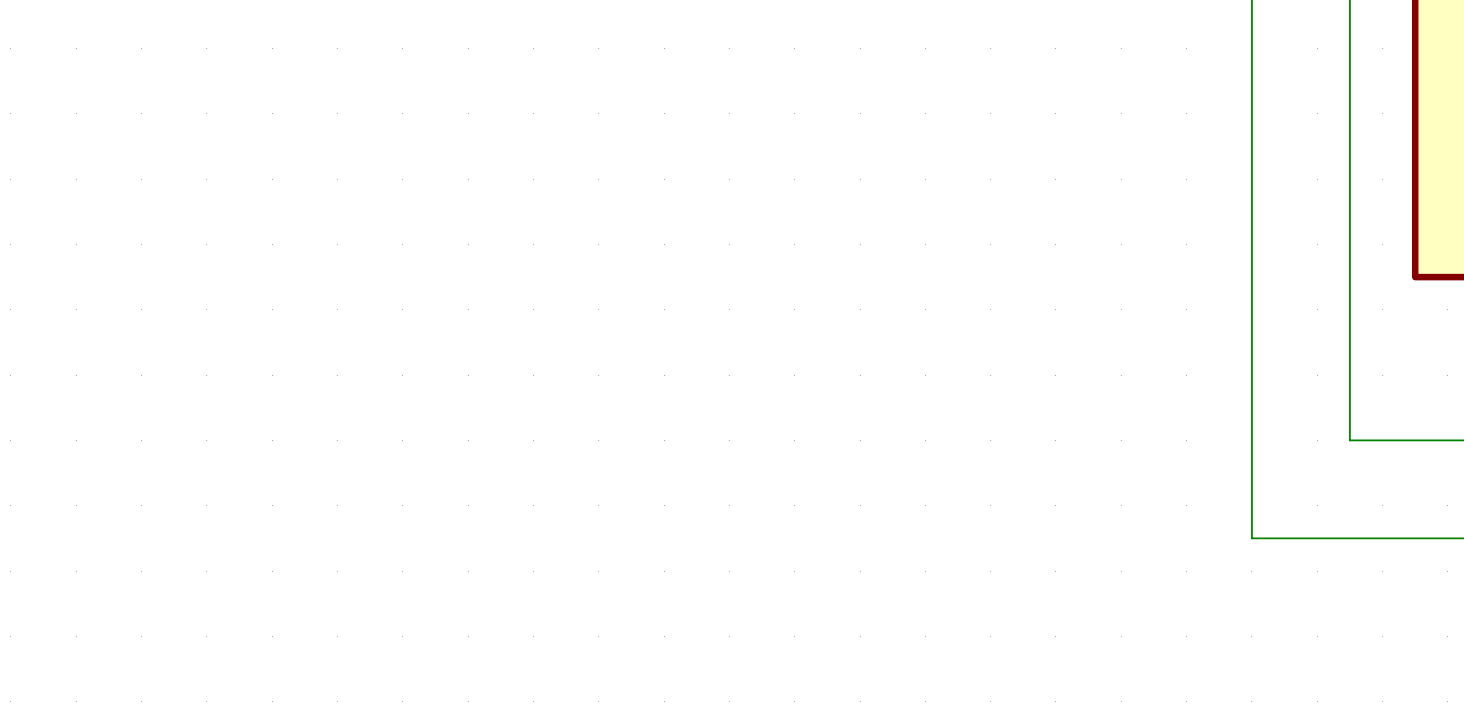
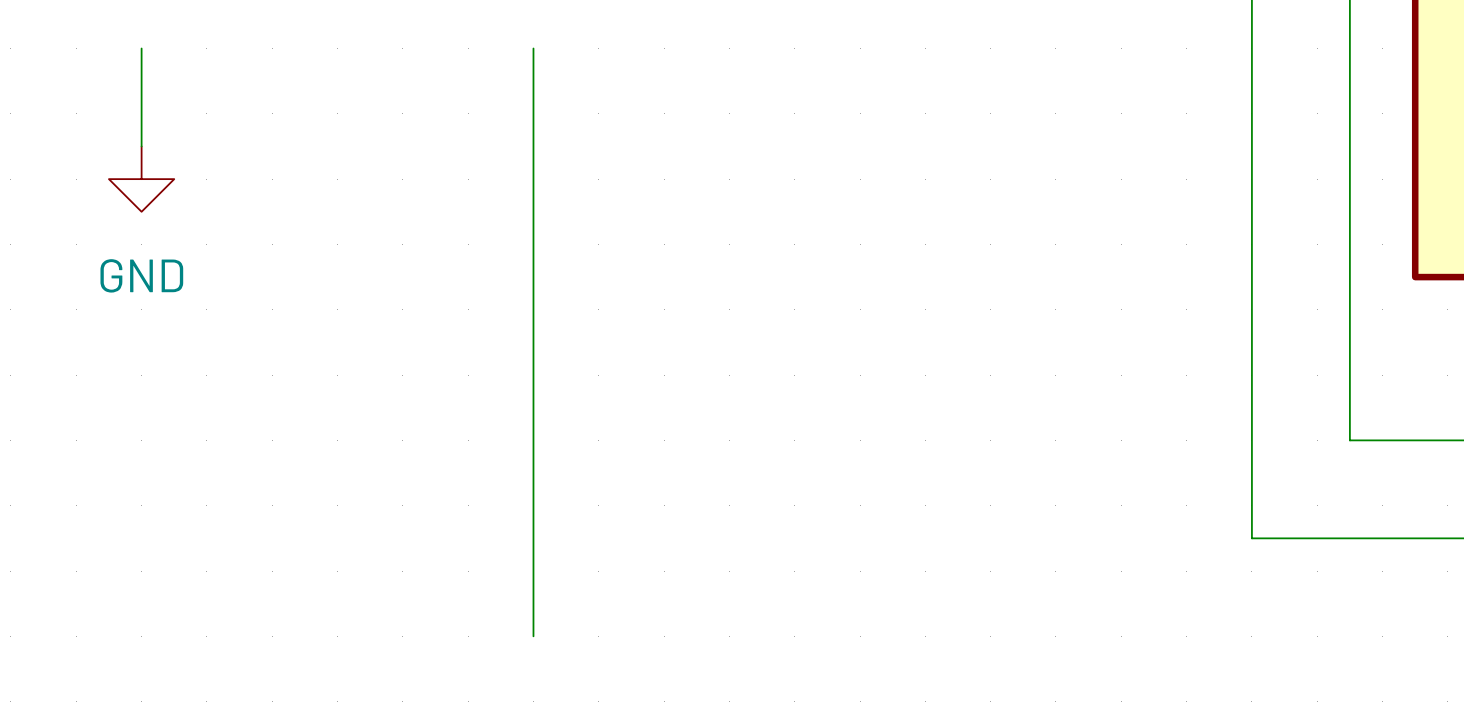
wire: none -> (141, 48) (141, 146)
wire: none -> (533, 48) (533, 636)
power symbol: none -> GND (141, 179)

